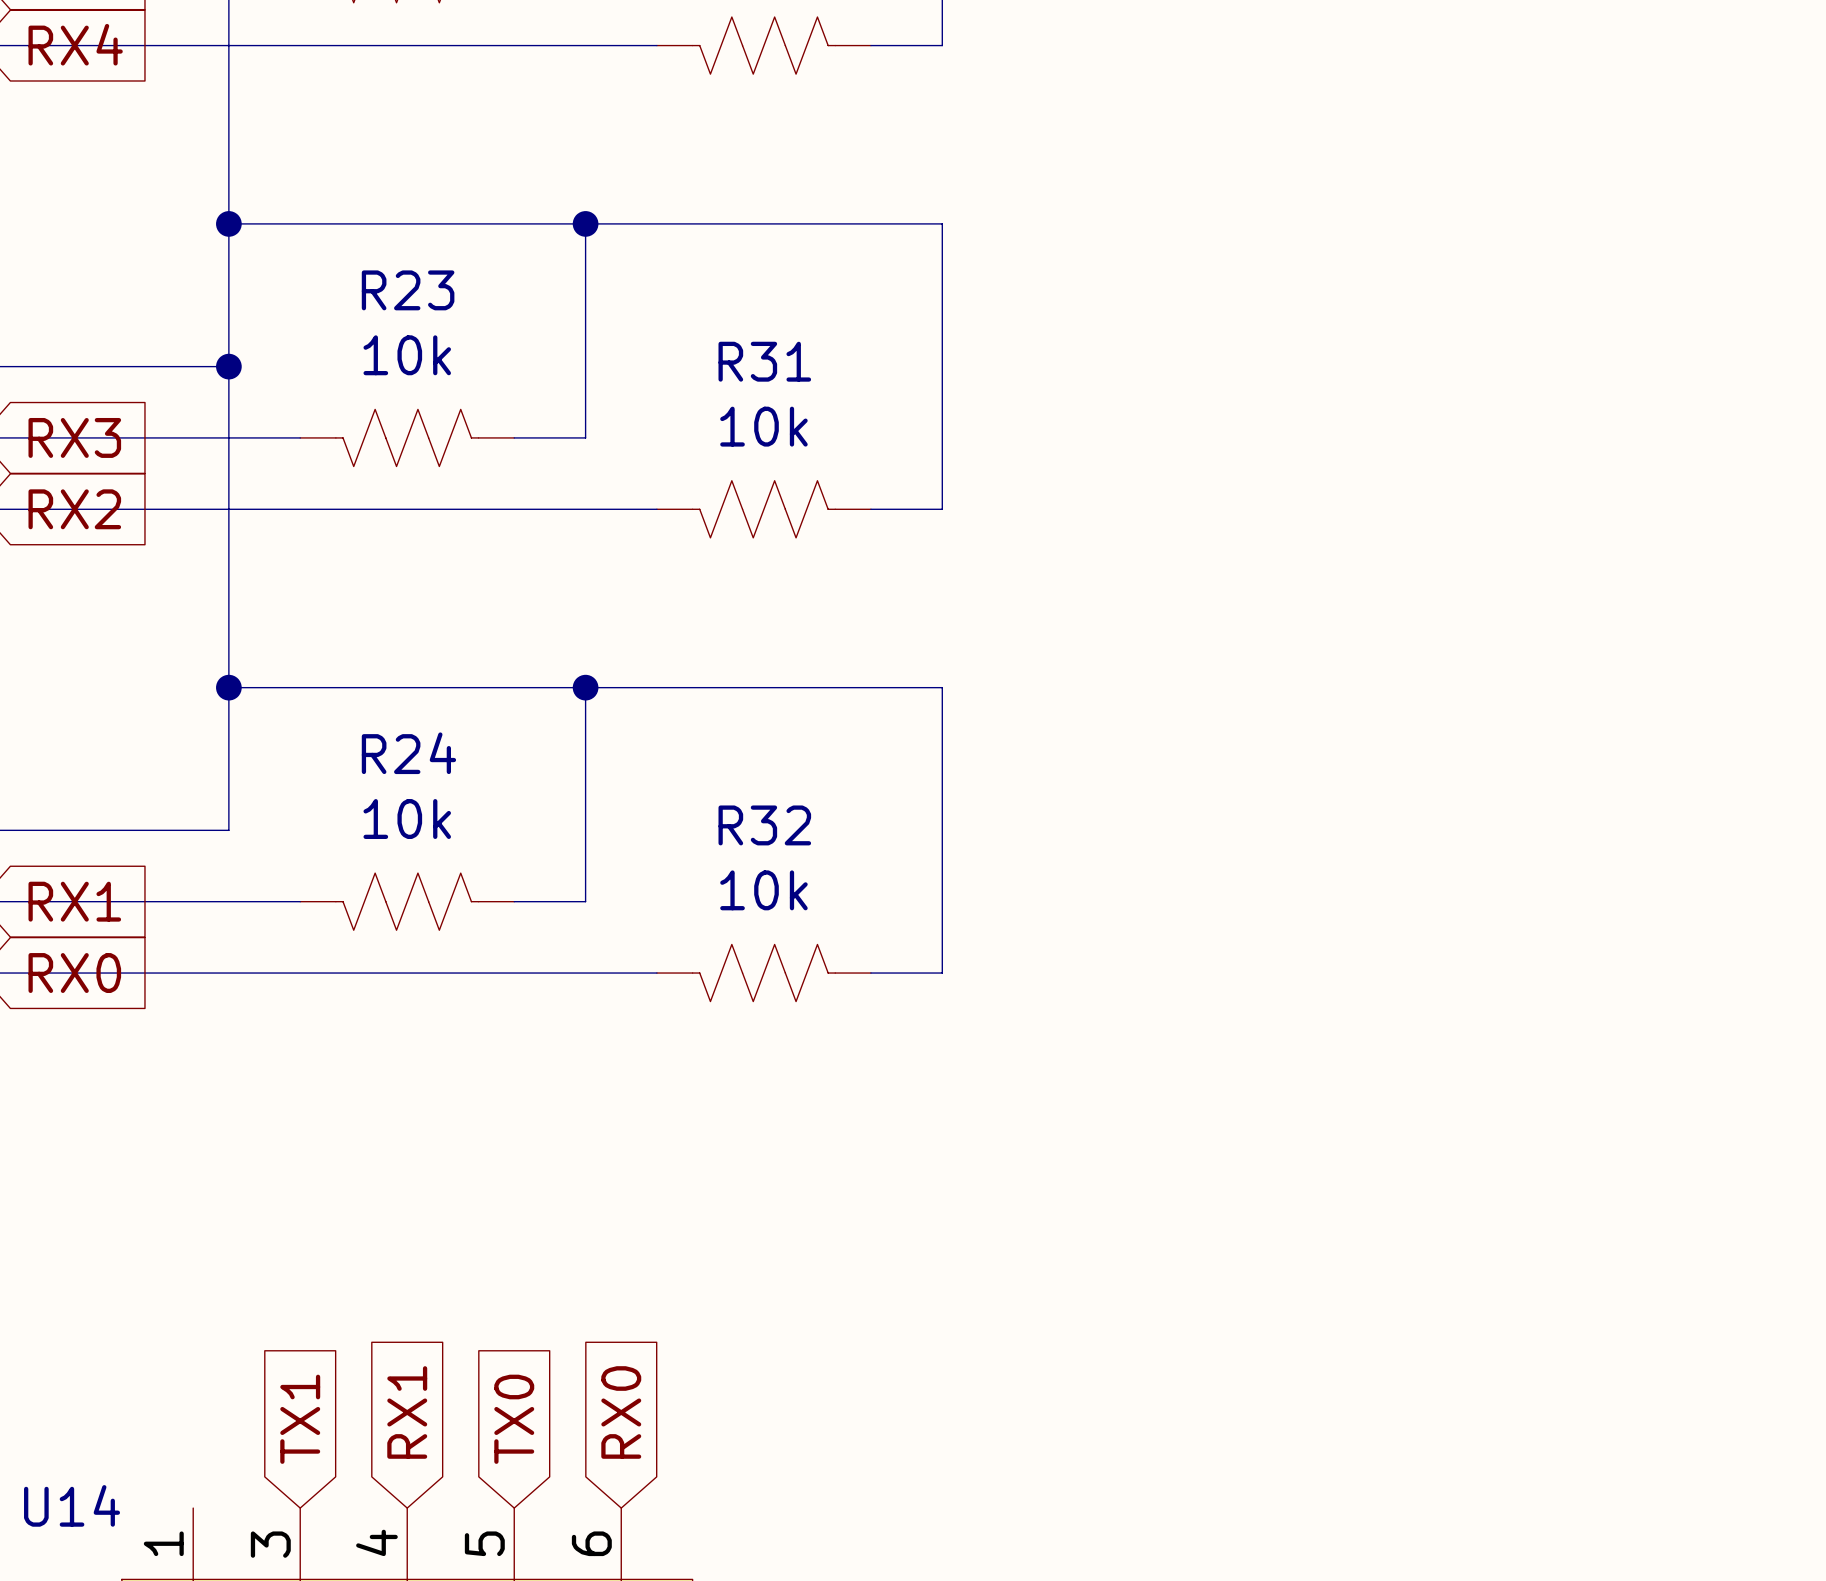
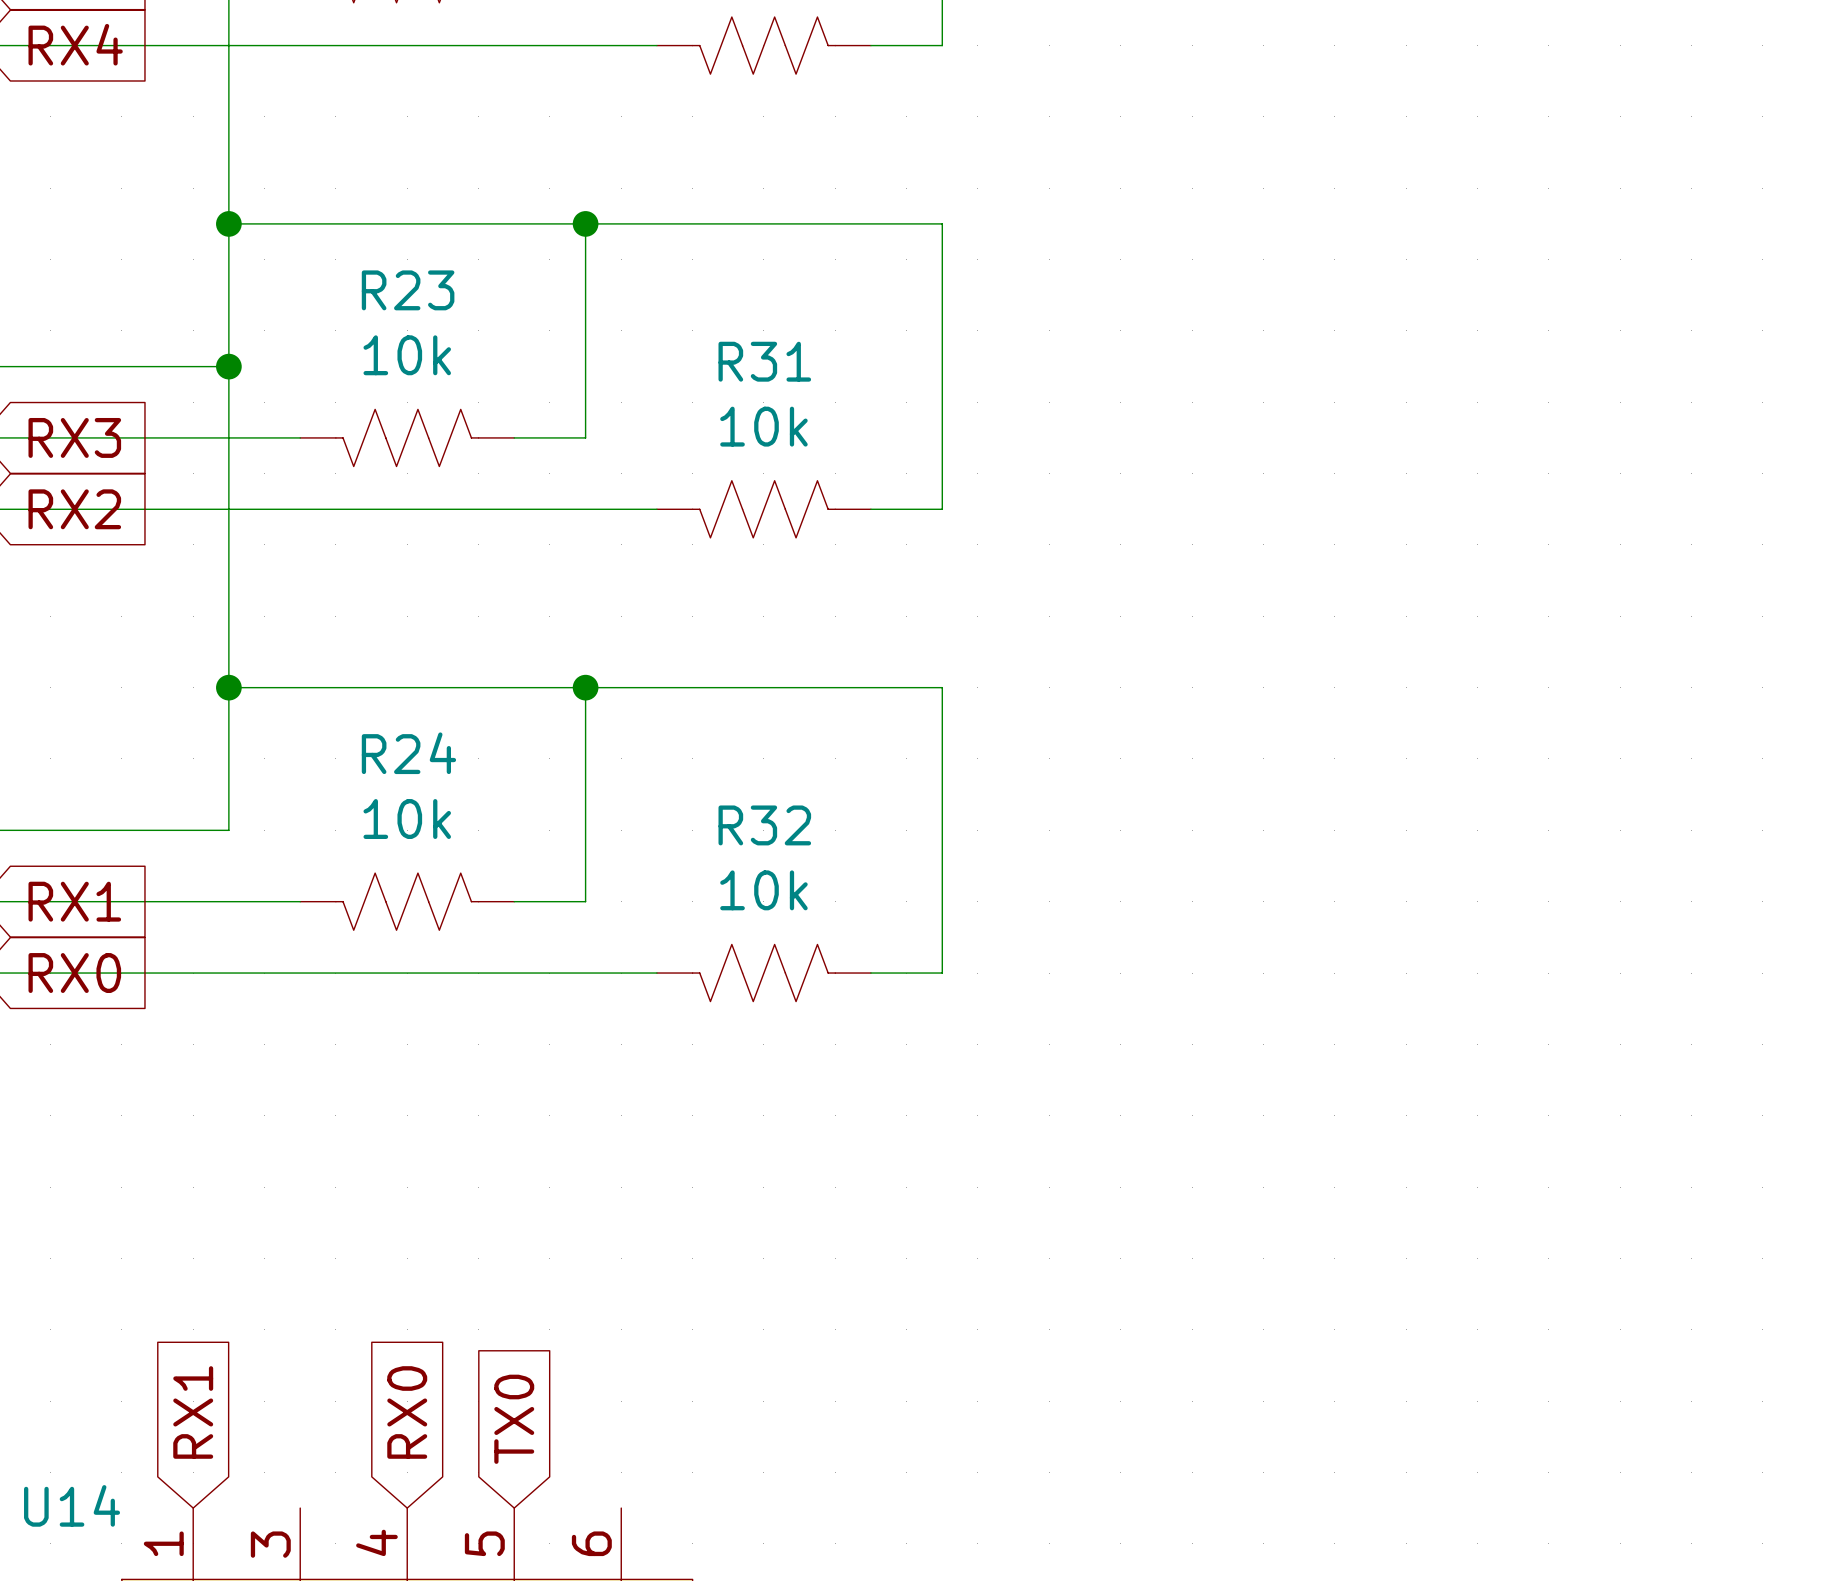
global label: none -> RX1 (193, 1412)
global label: RX1 (407, 1412) -> RX0 (407, 1412)
global label: RX0 (621, 1412) -> none
global label: TX1 (300, 1419) -> none

